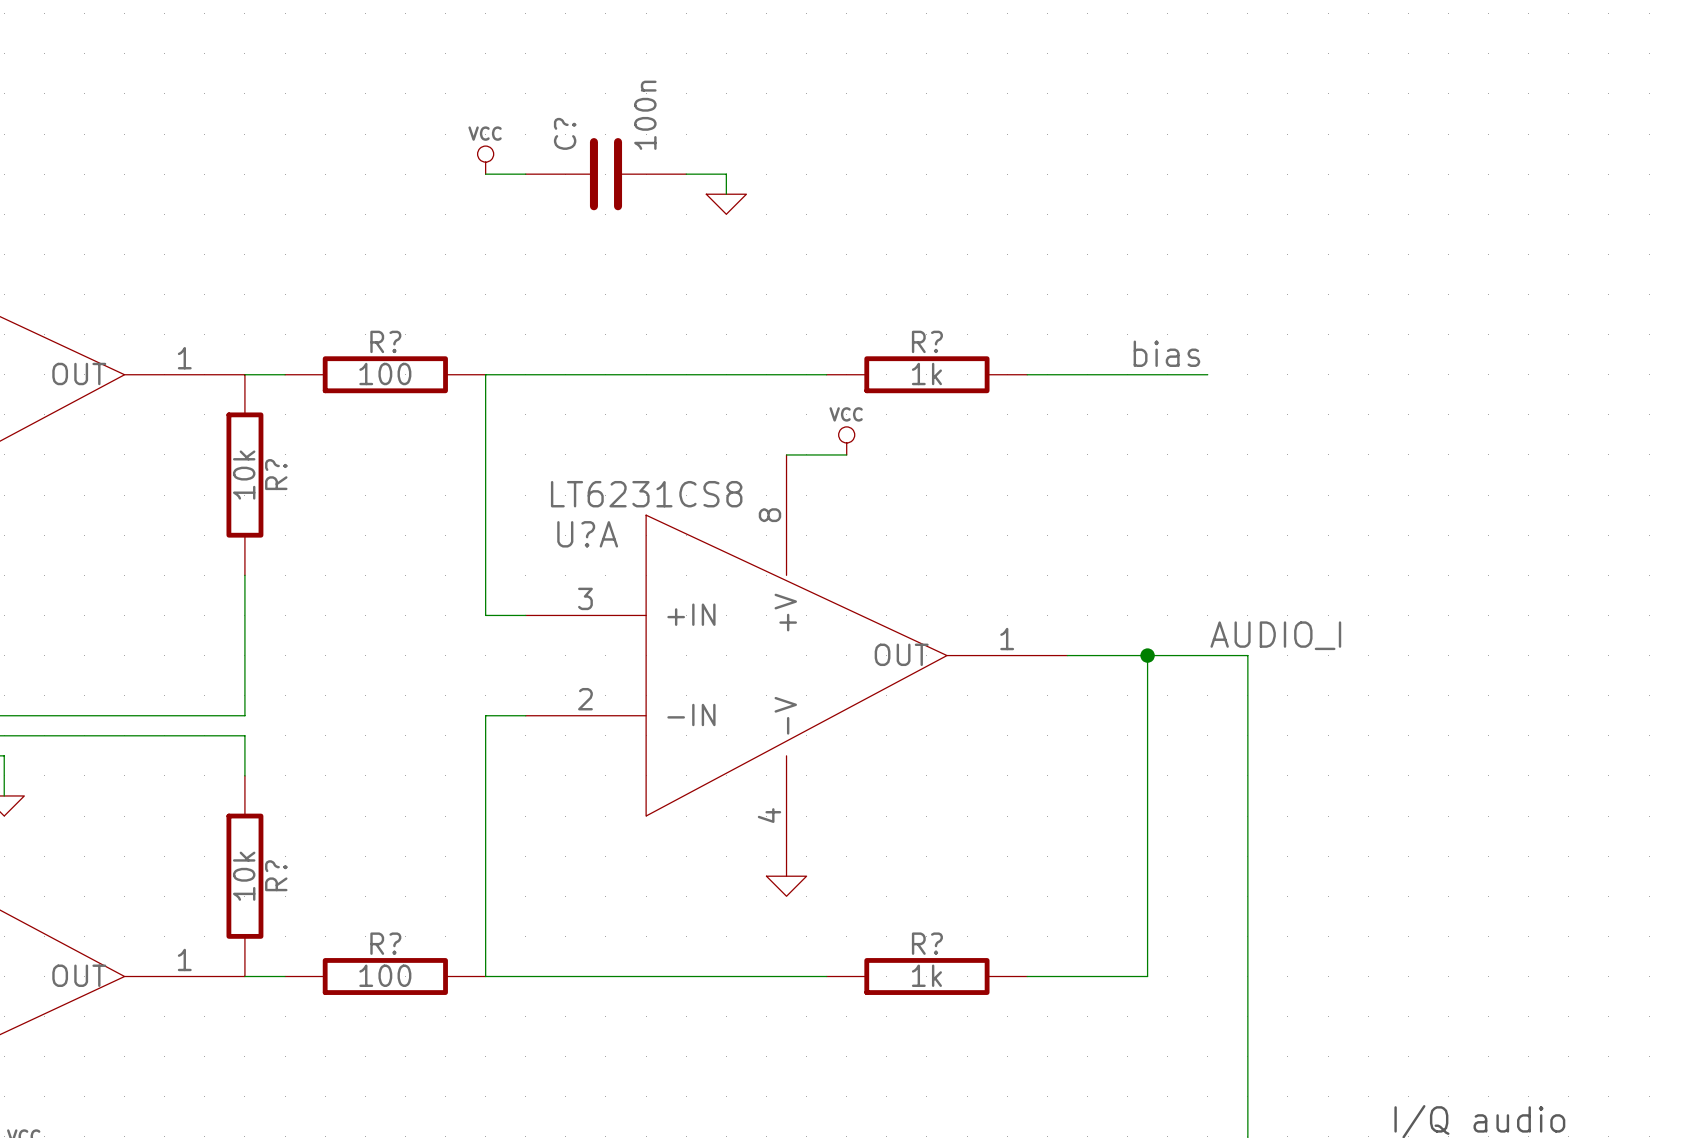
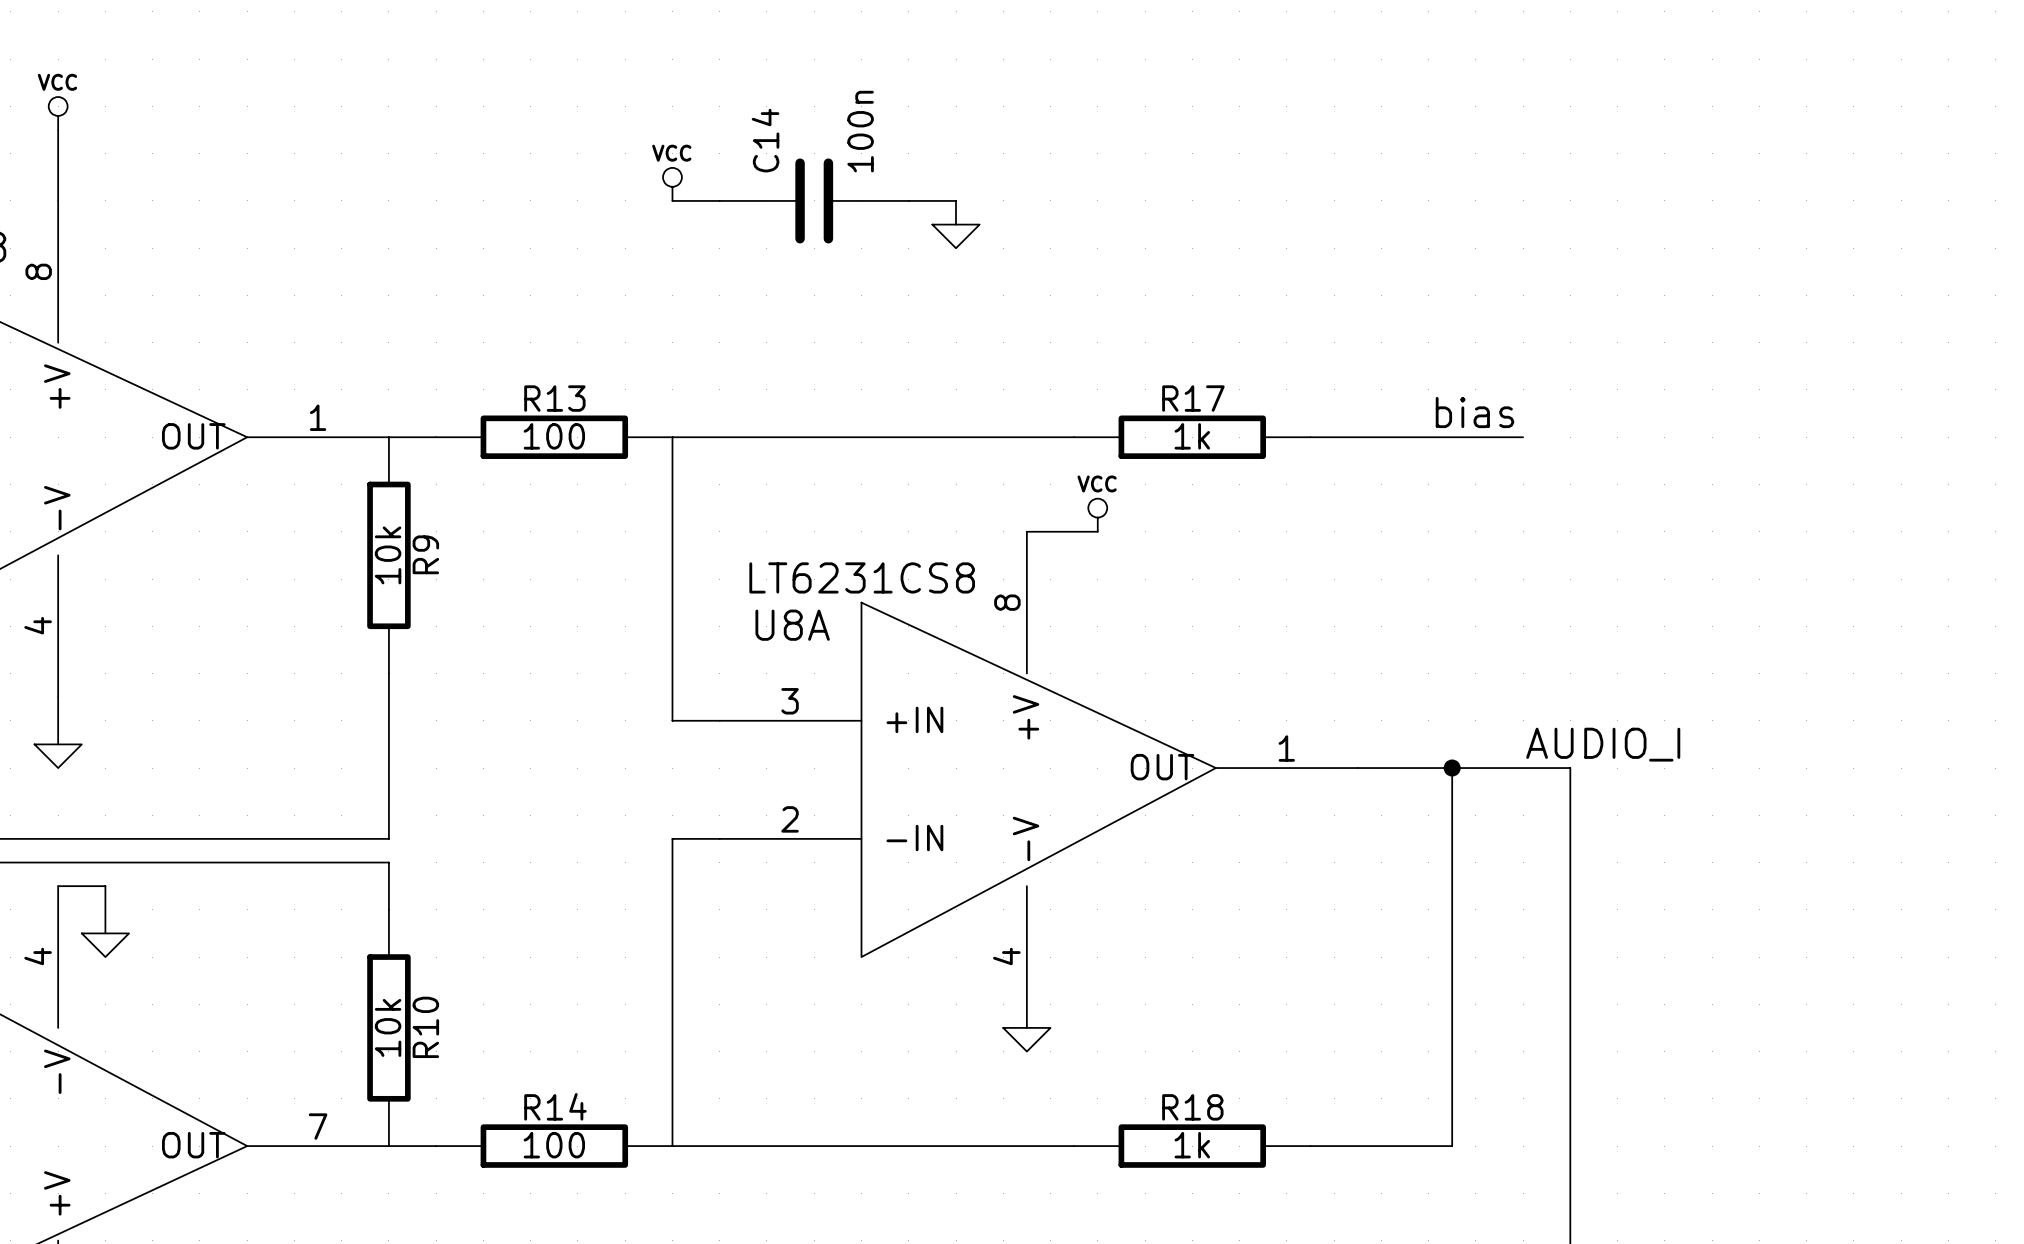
C? name: C? (565, 133) -> C14 (765, 140)
R? name: R? (385, 341) -> R13 (554, 398)
R? name: R? (927, 341) -> R17 (1193, 398)
R? name: R? (276, 474) -> R9 (425, 554)
U?A name: U?A (587, 534) -> U8A (792, 625)
R? name: R? (276, 875) -> R10 (425, 1027)
R? name: R? (385, 943) -> R14 (555, 1106)
R? name: R? (927, 943) -> R18 (1192, 1107)
part pin number: 1 (184, 959) -> 7 (318, 1126)

